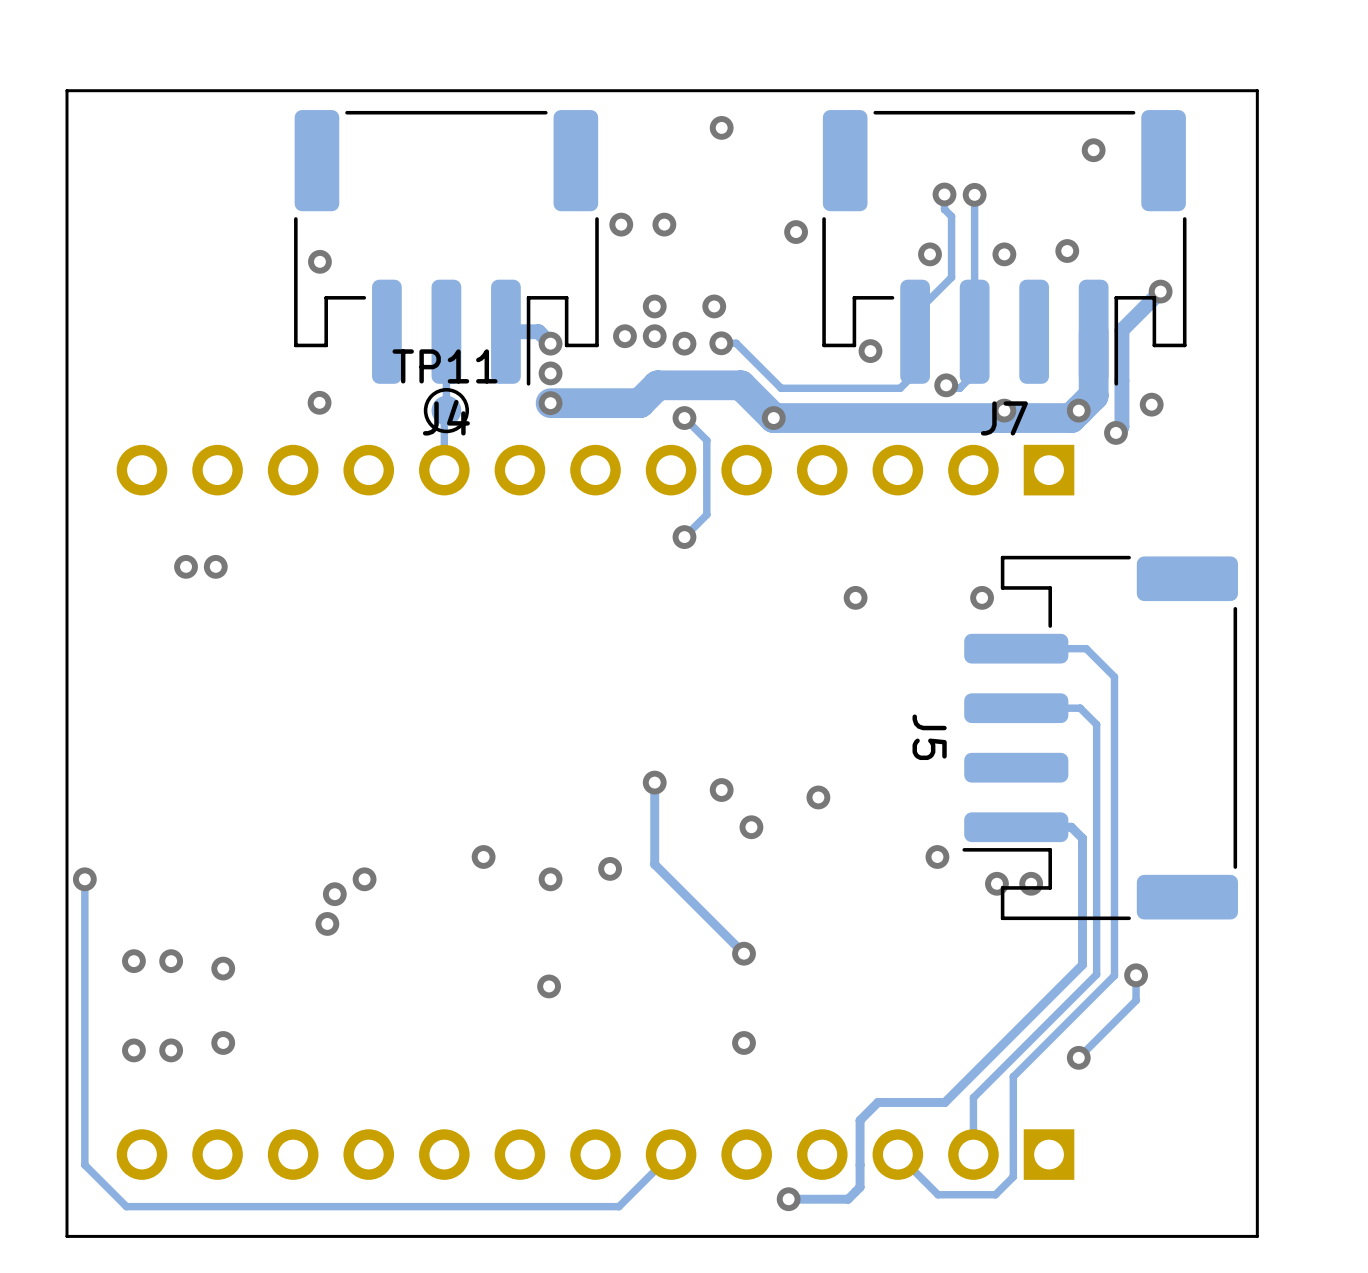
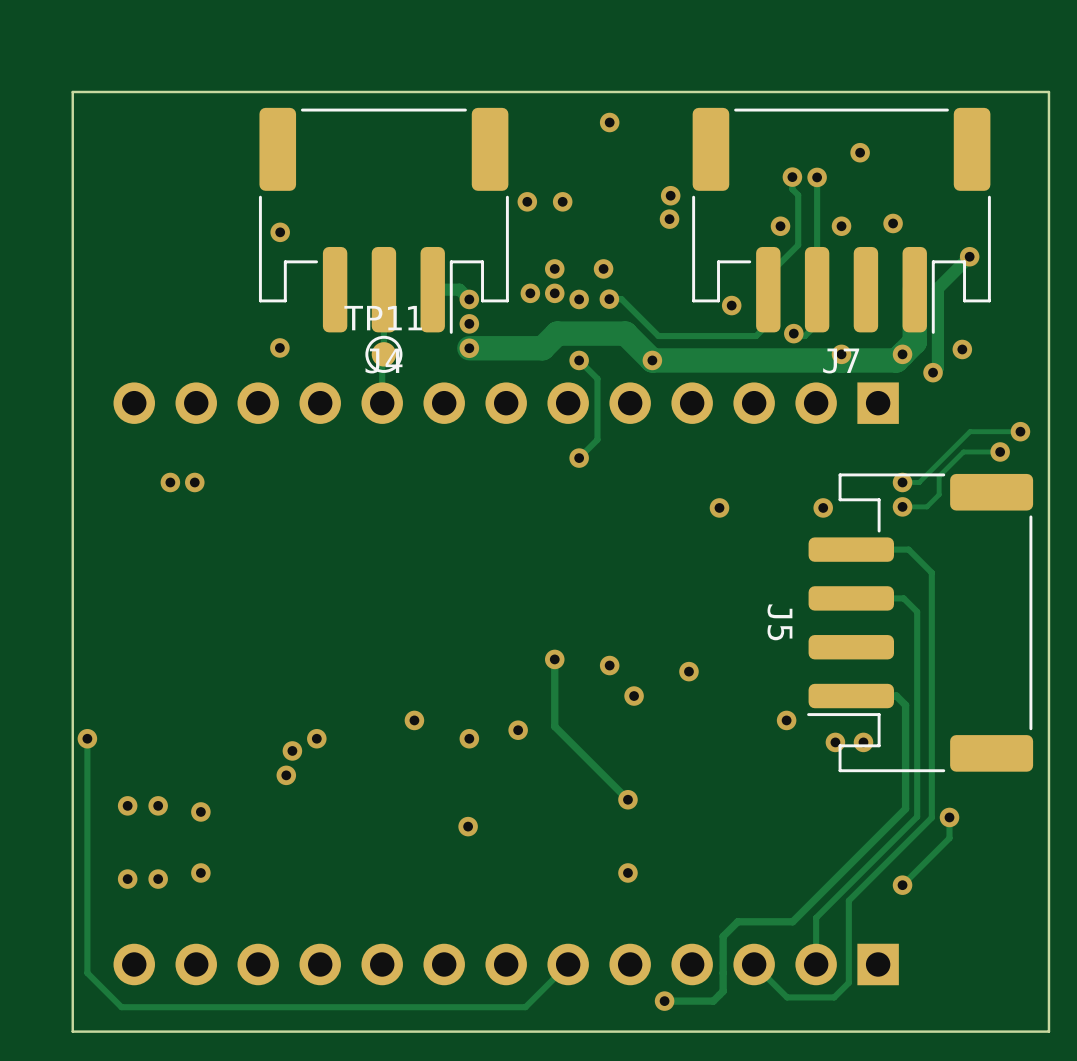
via position: (1093, 150) -> (860, 152)
via: none -> (670, 195)
via: (796, 232) -> none
via: none -> (669, 219)
track: none -> (1020, 431) (970, 431) (919, 482) (902, 482)
via: none -> (1020, 431)
track: none -> (1000, 451) (963, 451) (939, 476) (939, 494) (926, 506) (902, 506)
via: none -> (1000, 451)
via: none -> (902, 482)
via: none -> (902, 506)

